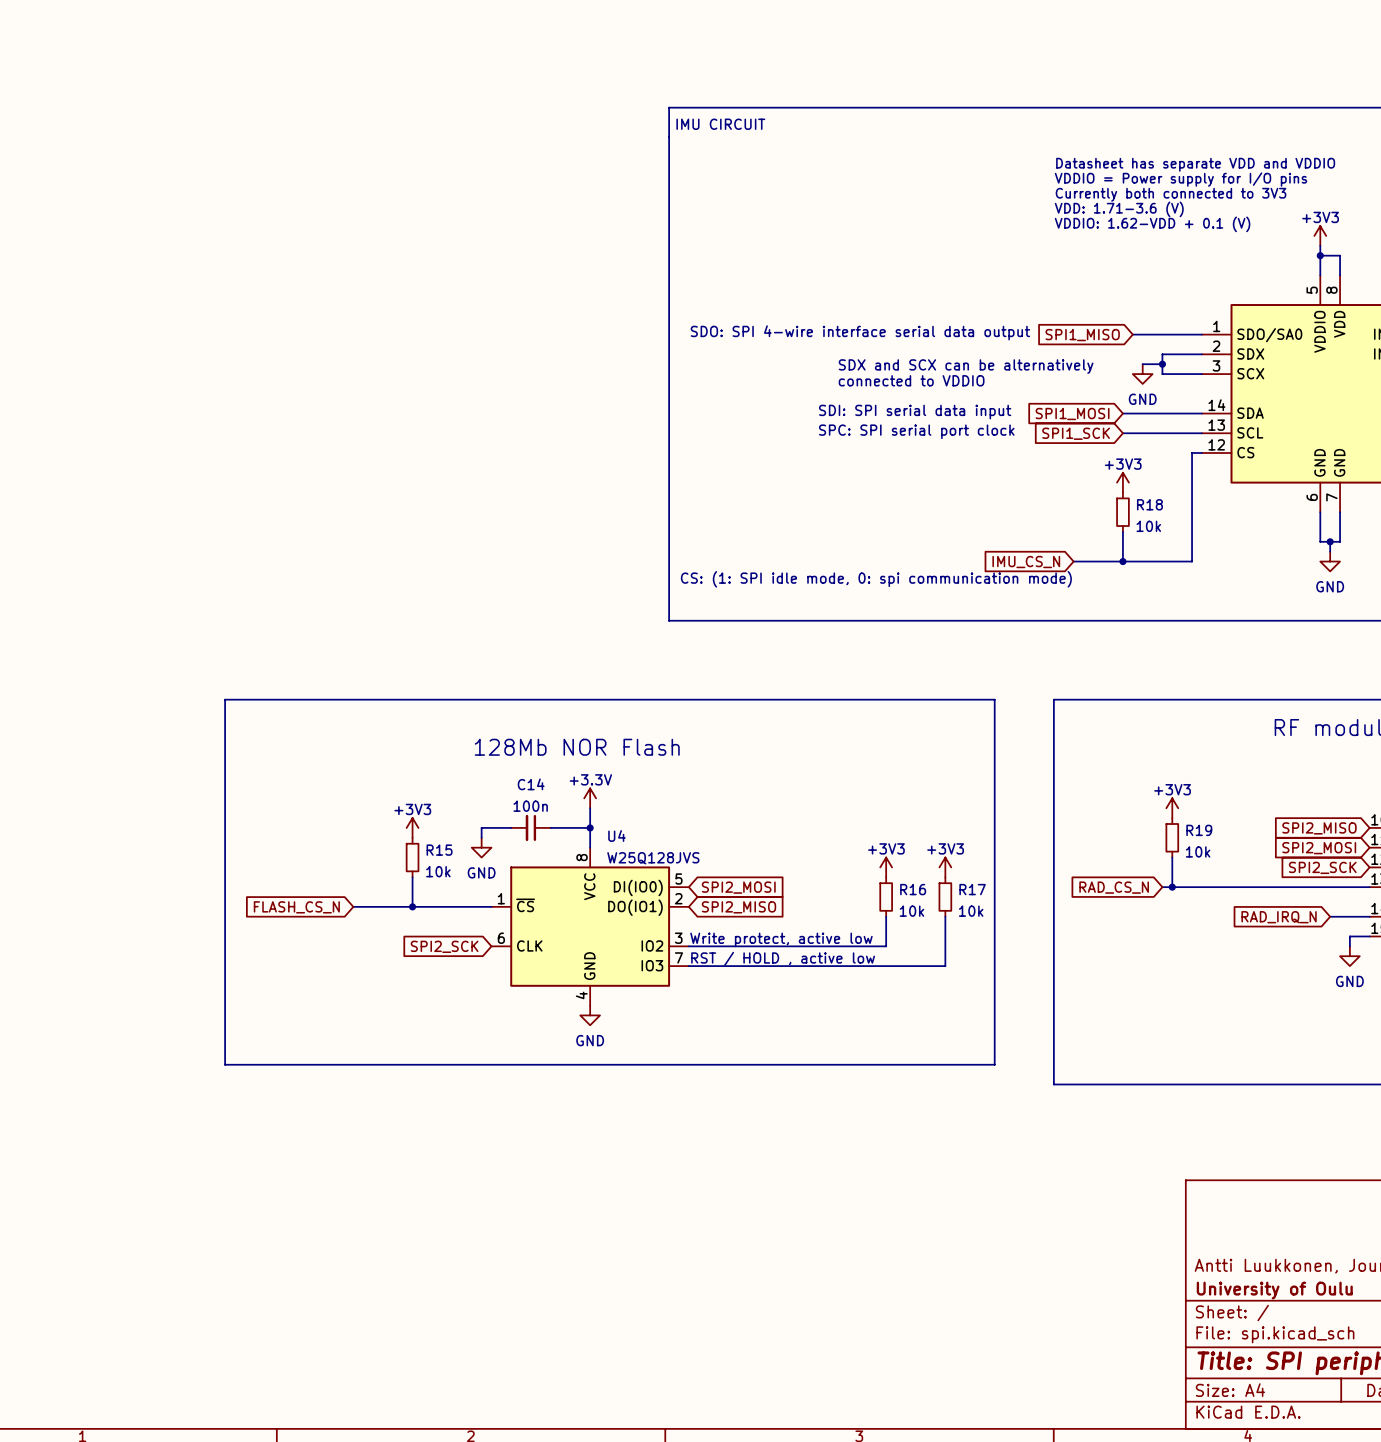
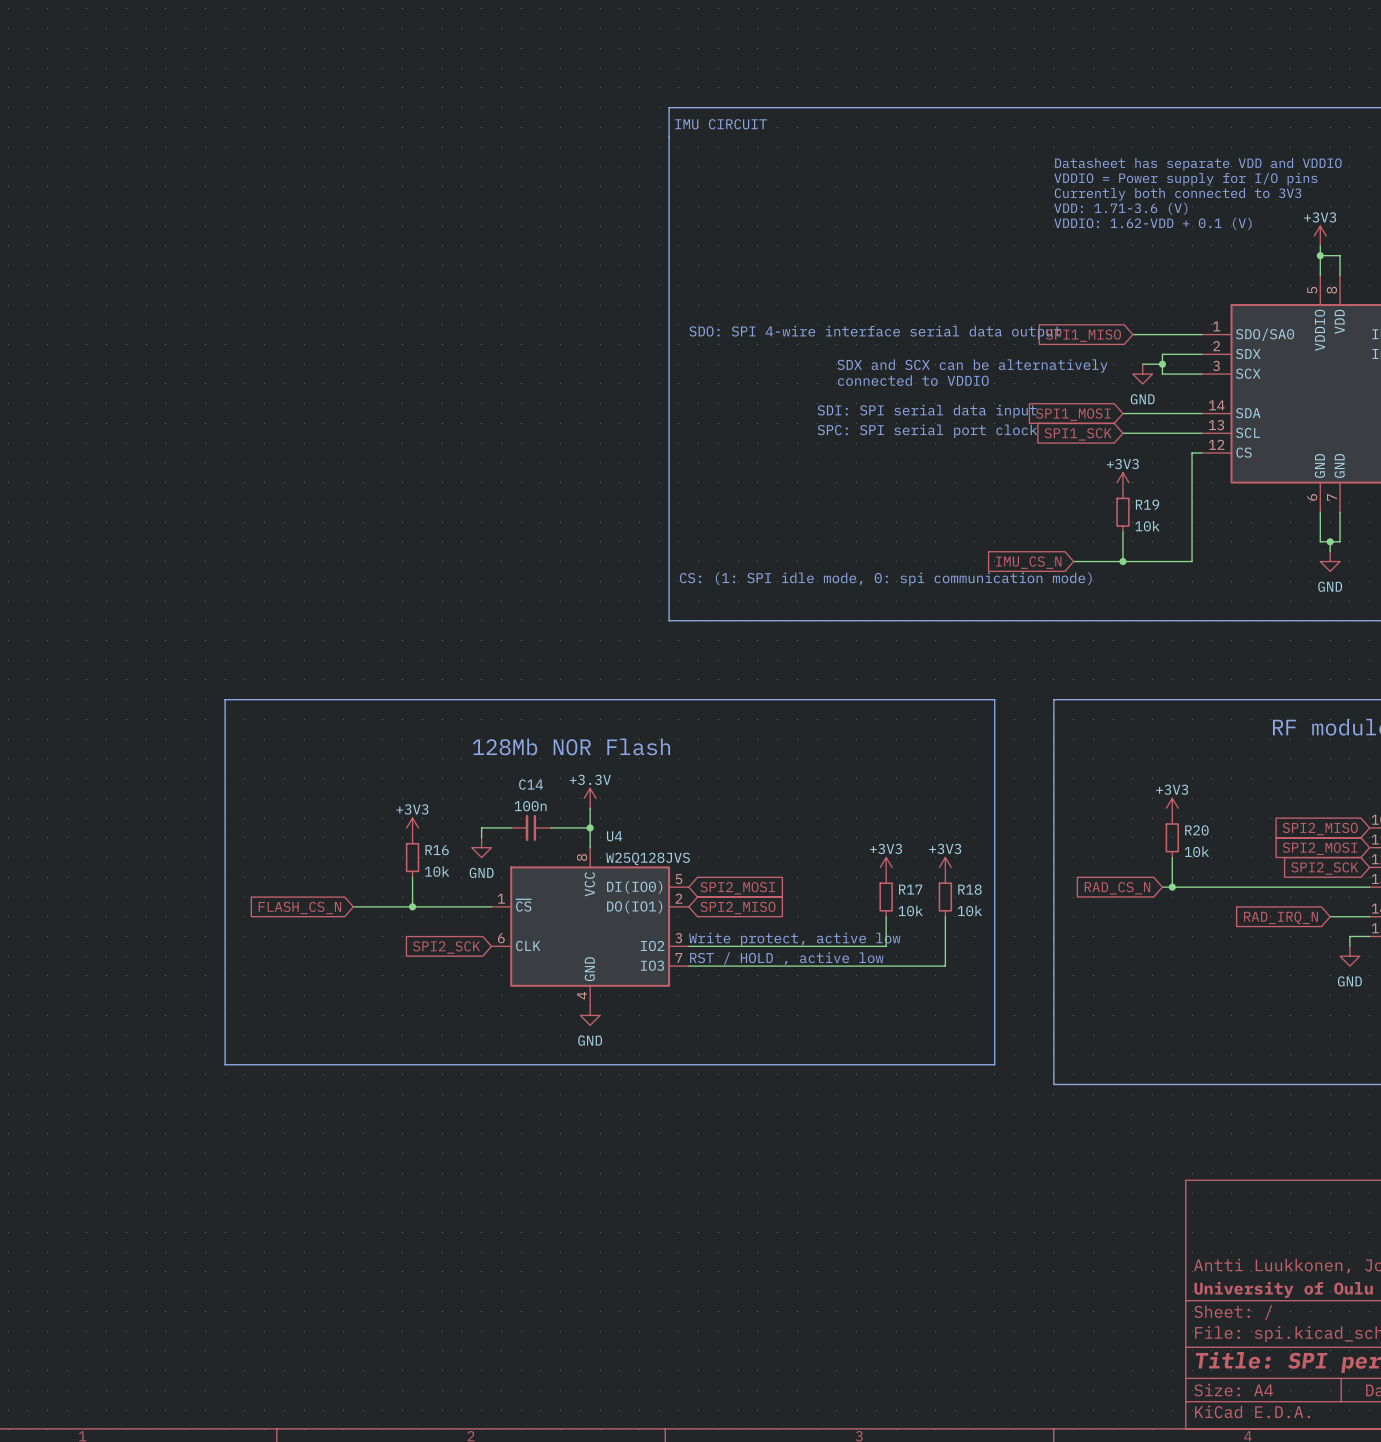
R18 name: R18 (1149, 504) -> R19 (1147, 504)
R19 name: R19 (1199, 830) -> R20 (1196, 830)
R15 name: R15 (439, 850) -> R16 (437, 850)
R16 name: R16 (913, 889) -> R17 (910, 889)
R17 name: R17 (972, 889) -> R18 (969, 889)

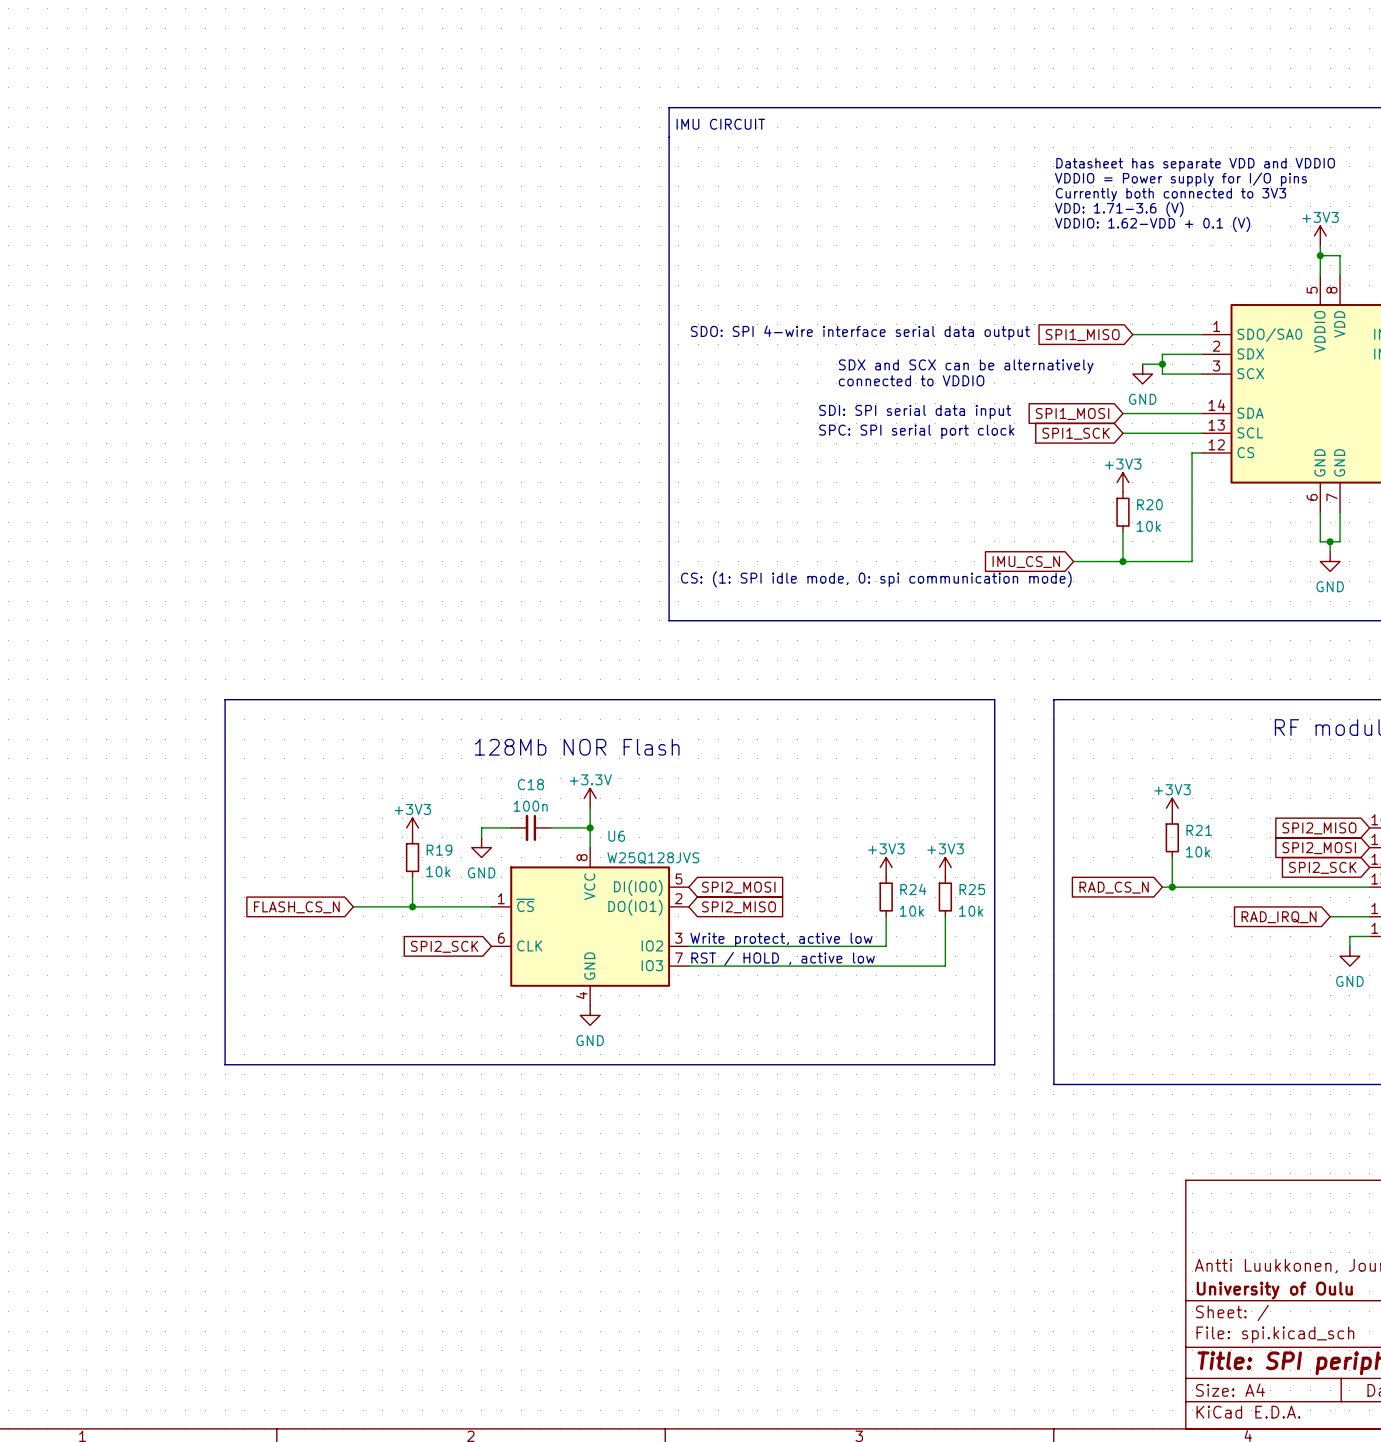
R19 name: R19 (1147, 504) -> R20 (1149, 504)
C14 name: C14 (531, 784) -> C18 (530, 784)
R20 name: R20 (1196, 830) -> R21 (1199, 830)
U4 name: U4 (614, 836) -> U6 (616, 836)
R16 name: R16 (437, 850) -> R19 (439, 850)
R17 name: R17 (910, 889) -> R24 (913, 889)
R18 name: R18 (969, 889) -> R25 (972, 889)

